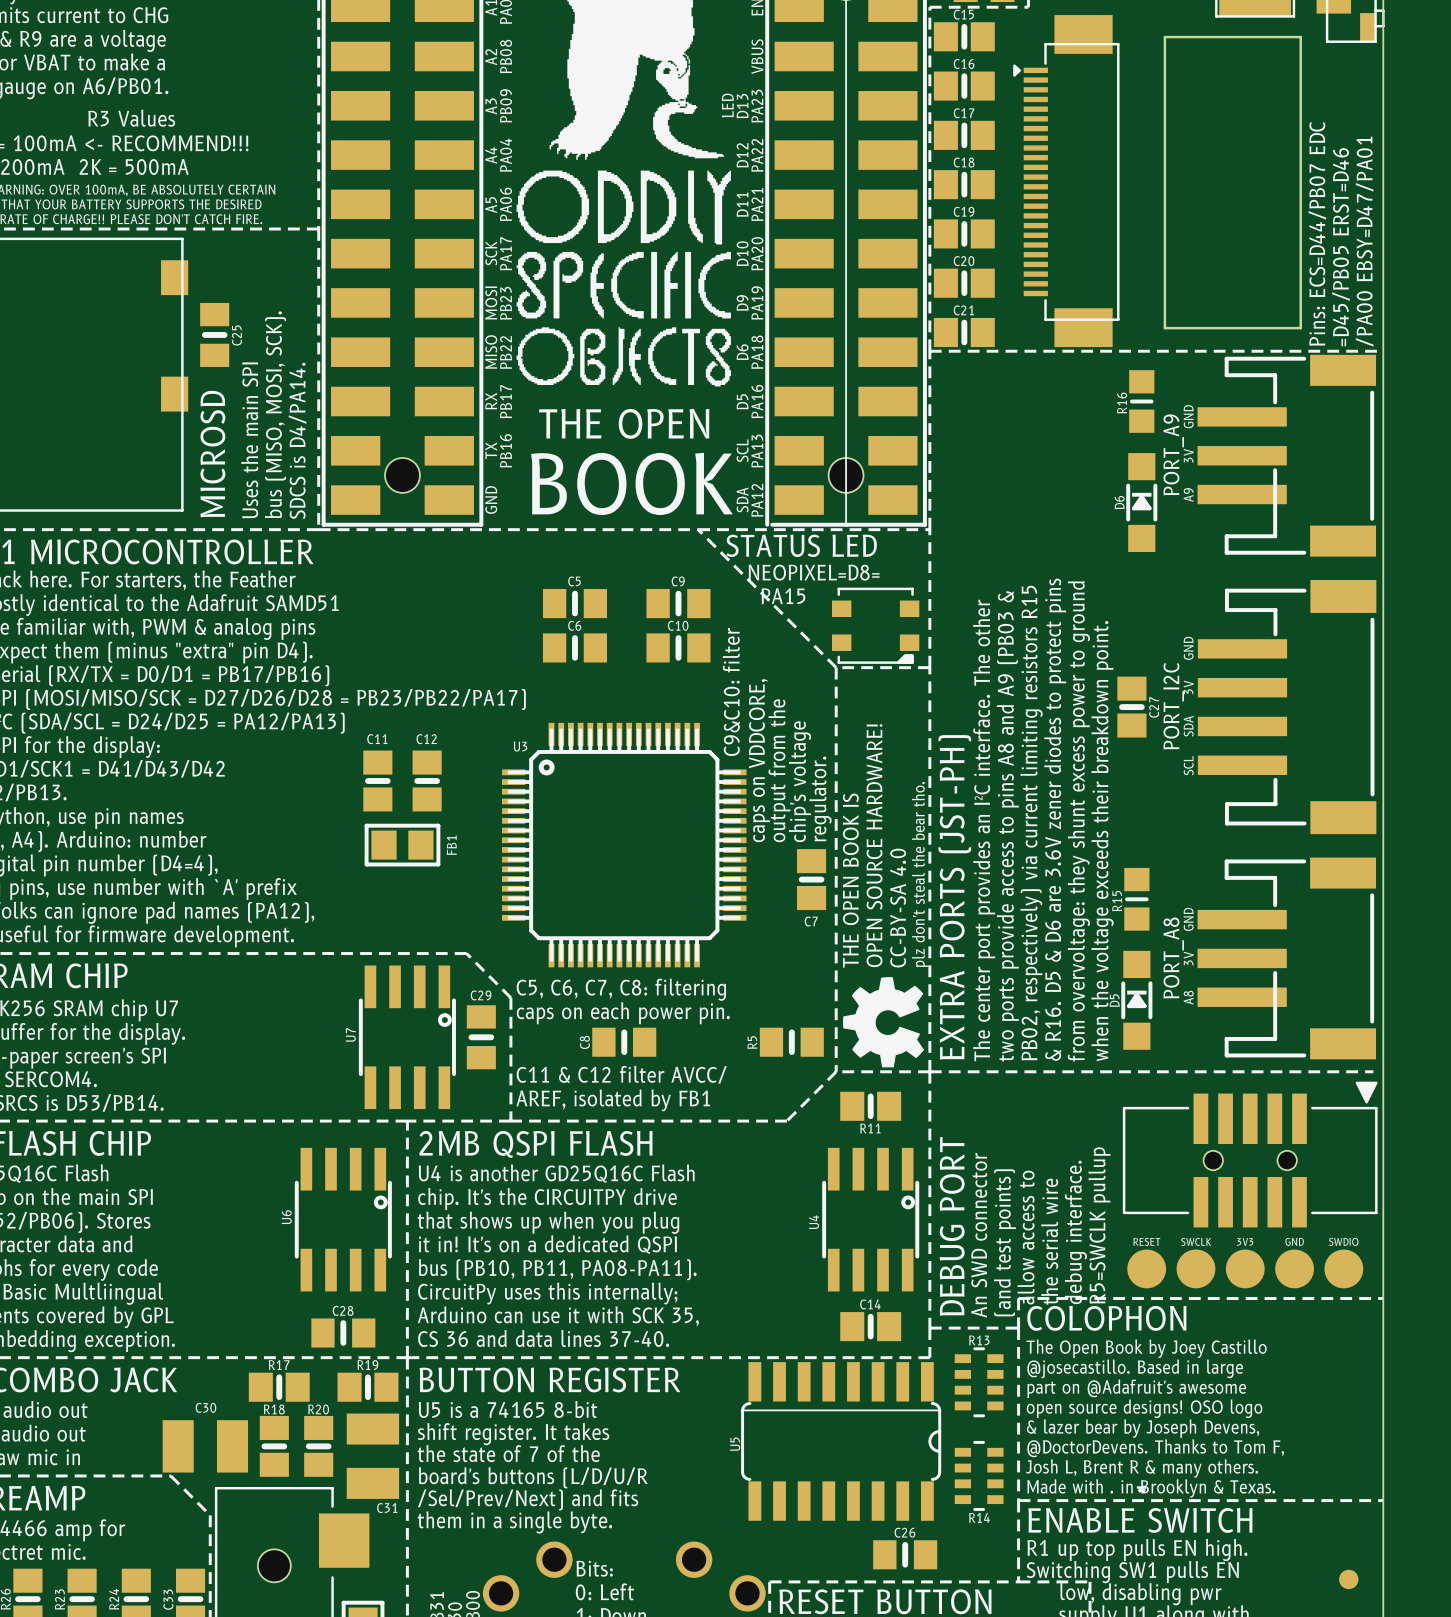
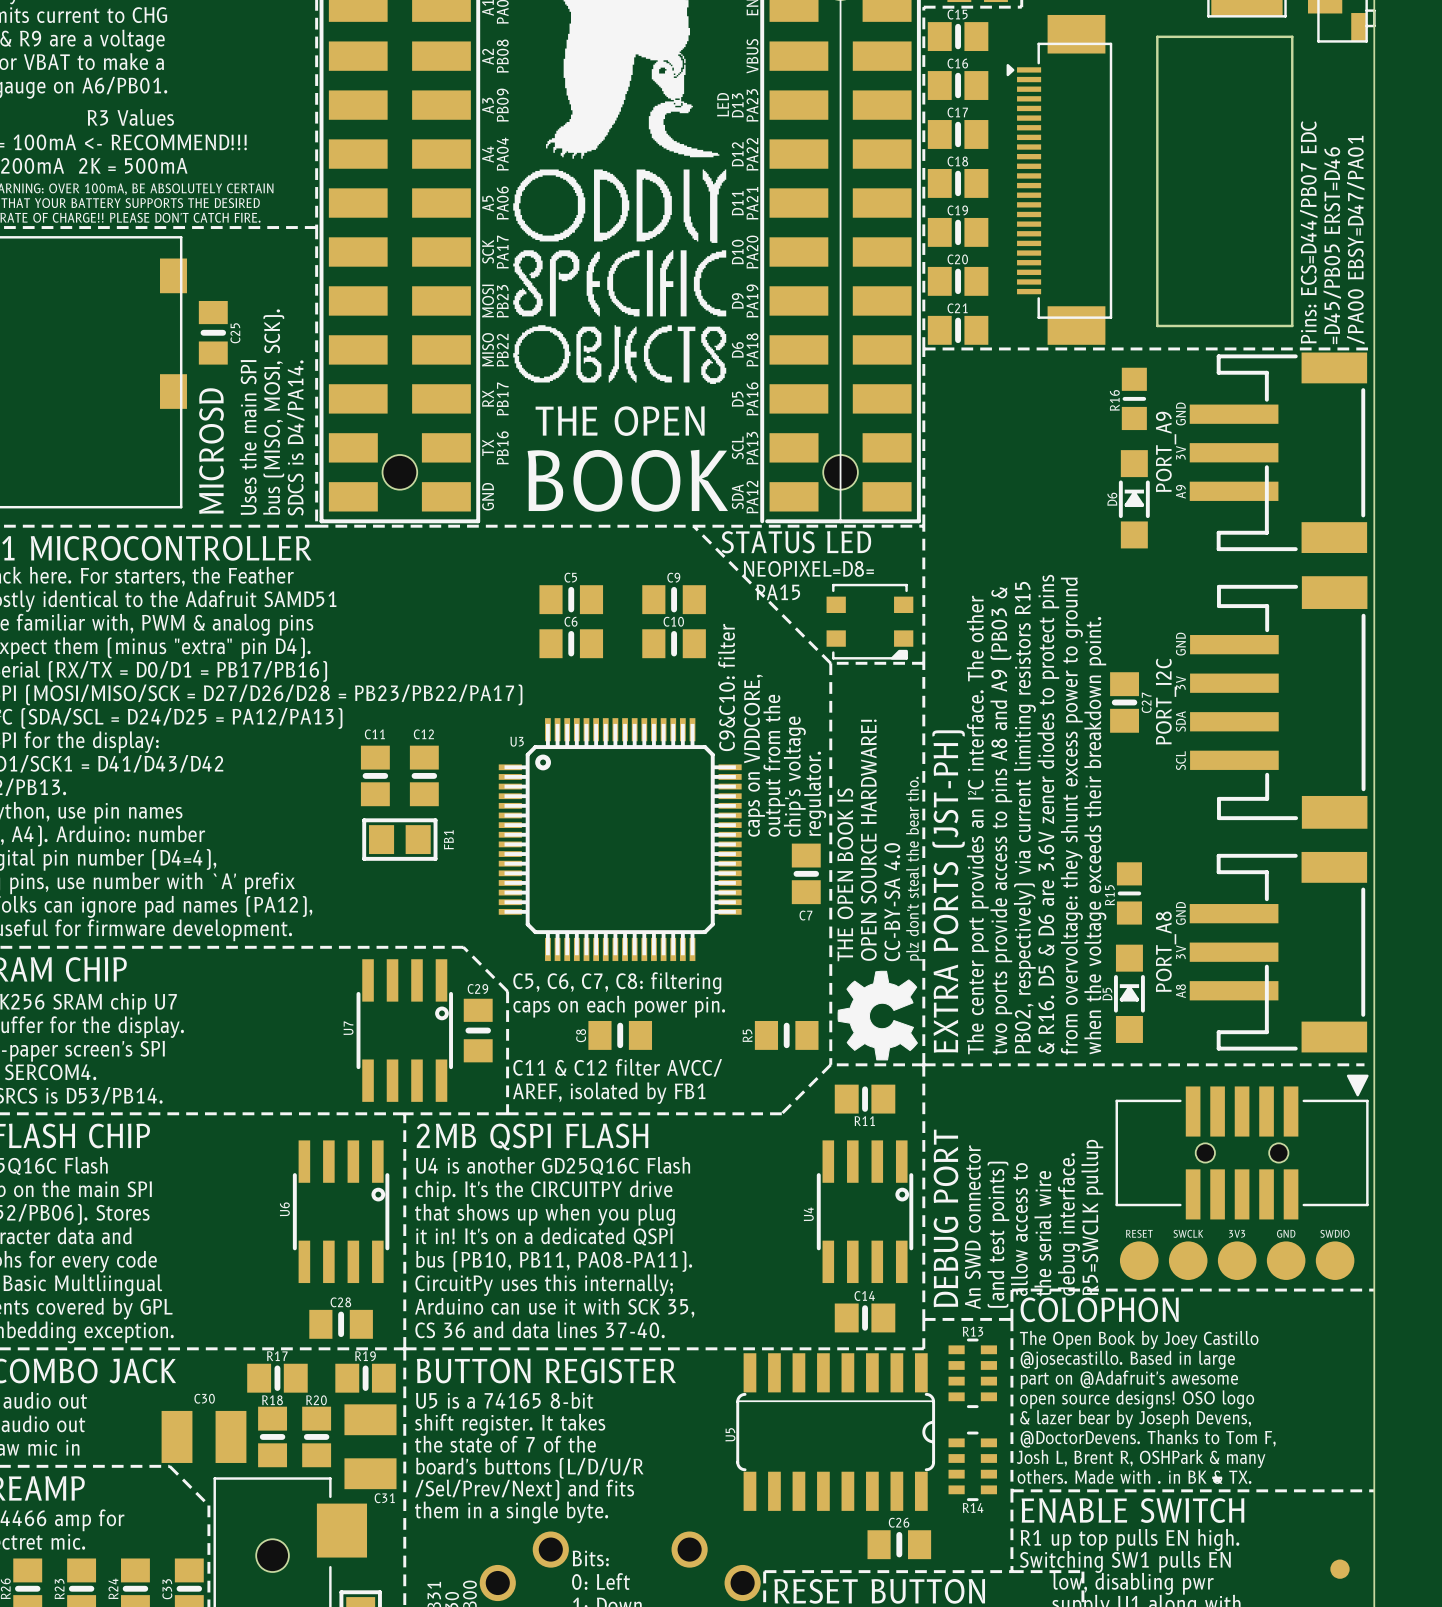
text: Josh L, Brent R & many others. (1142, 1468) -> Josh L, Brent R, OSHPark & many (1141, 1458)
line: (1144, 1486) (1141, 1491) (1139, 1486) -> (1219, 1476) (1217, 1481) (1214, 1476)
text: Made with . in Brooklyn & Texas. (1151, 1488) -> others. Made with . in BK & TX. (1134, 1476)

